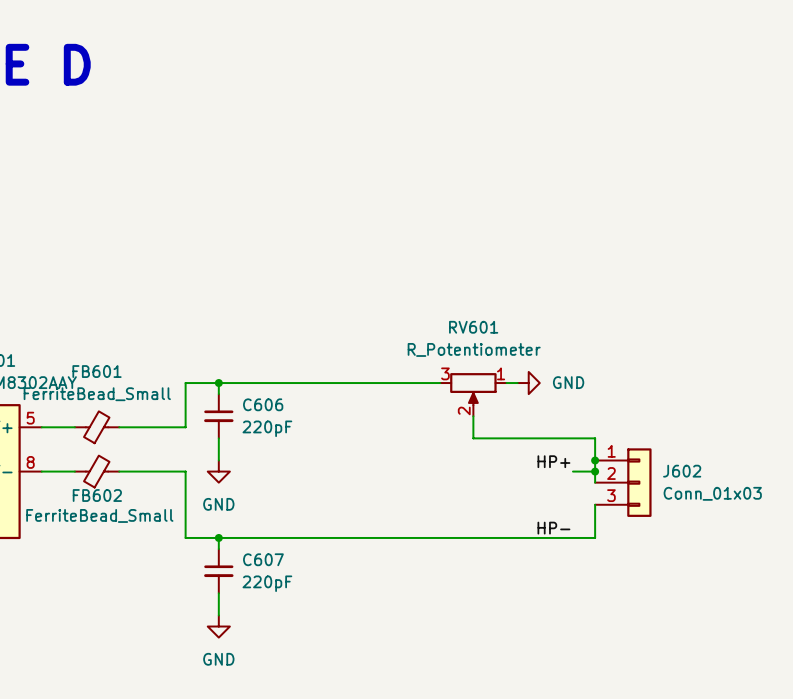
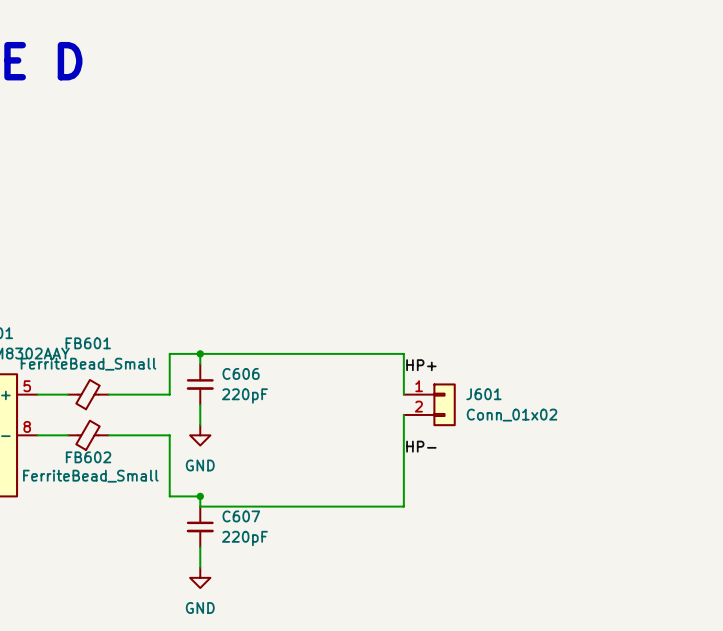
wire: none -> (403, 353) (403, 394)
wire: (506, 383) (517, 383) -> none
power symbol: GND (528, 383) -> none
RV601: R_Potentiometer (473, 394) -> none
wire: (473, 416) (473, 438) (595, 438) (595, 482) -> none
J601: none -> Conn_01x02 (429, 404)
wire: none -> (403, 414) (403, 506) (200, 506)
junction: (595, 460) -> none
label position: HP+ (553, 461) -> HP+ (421, 365)
wire: (572, 471) (595, 471) -> none
junction: (595, 471) -> none
J602: Conn_01x03 (623, 482) -> none
wire: (595, 504) (595, 537) (218, 537) -> none
label position: HP- (553, 528) -> HP- (421, 446)

